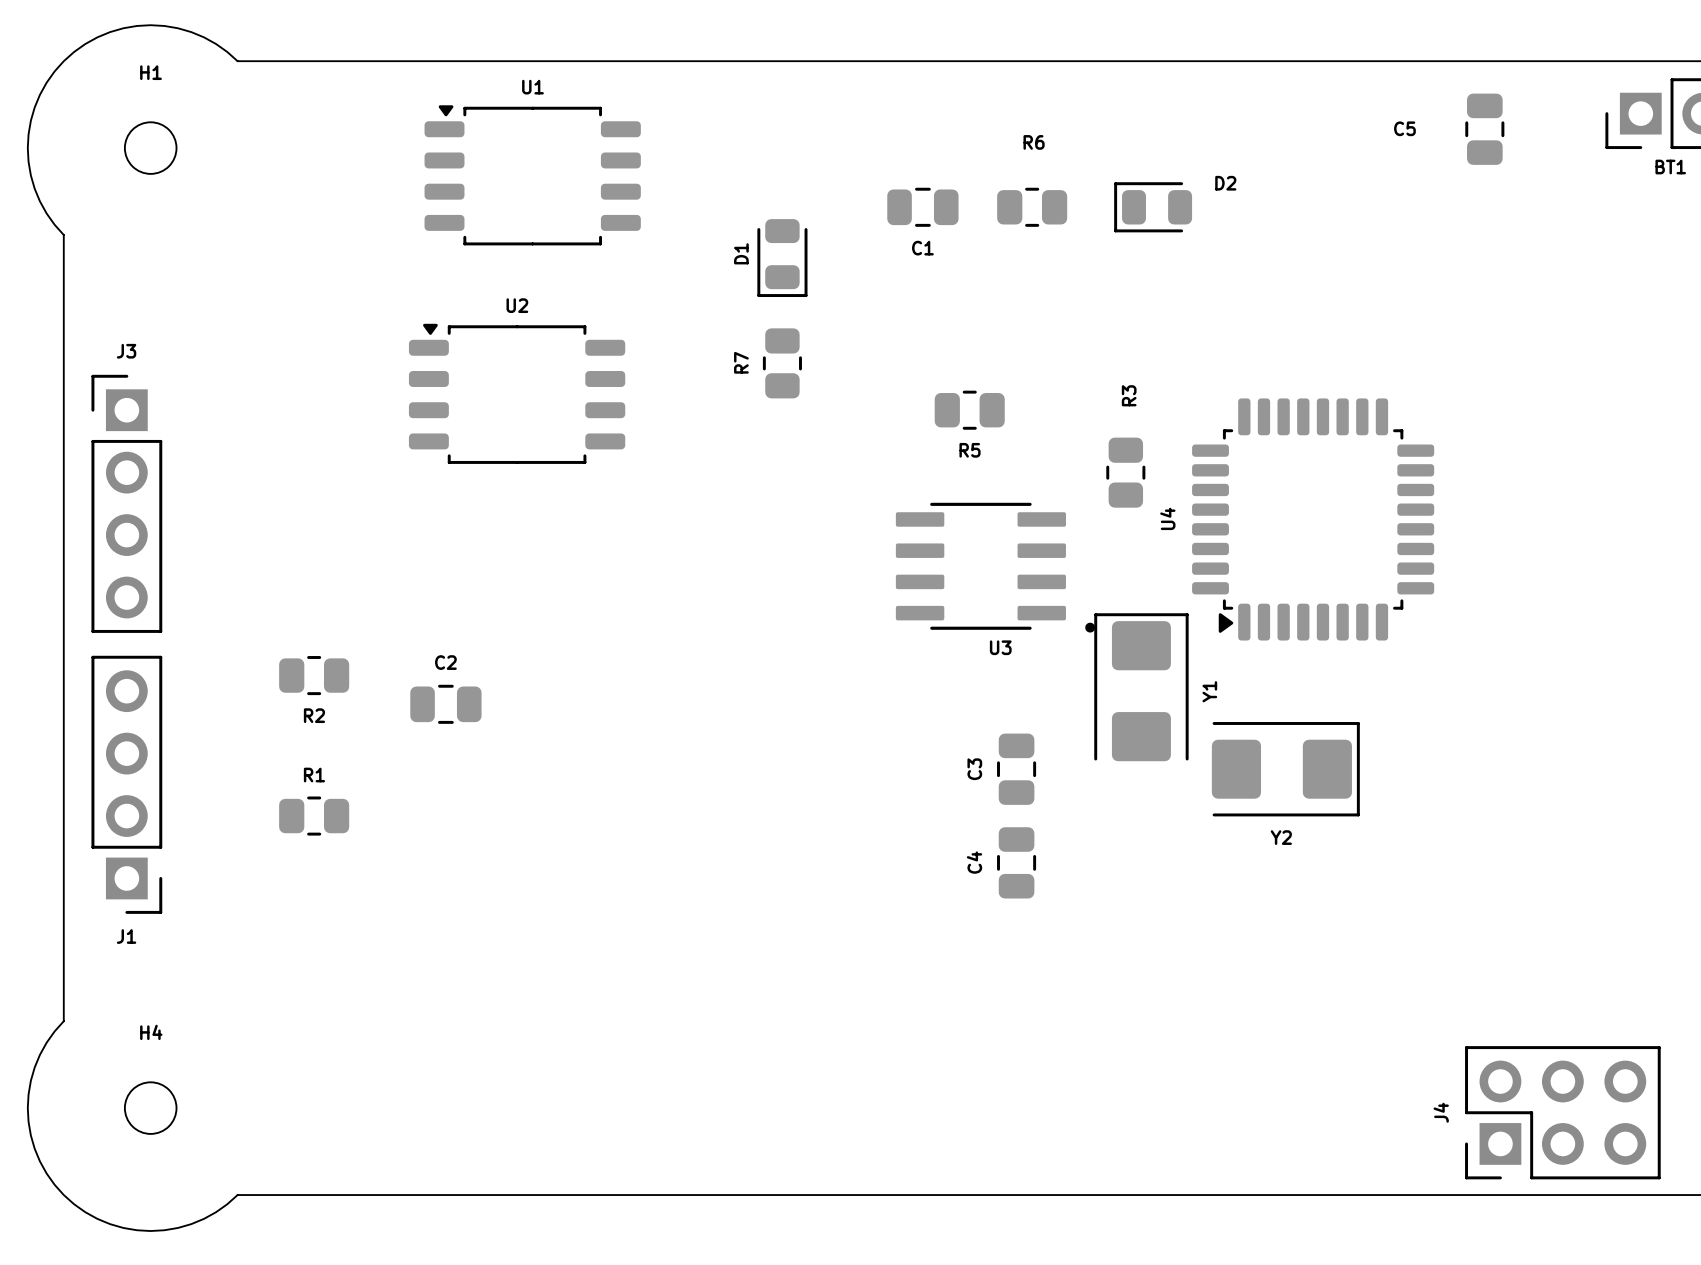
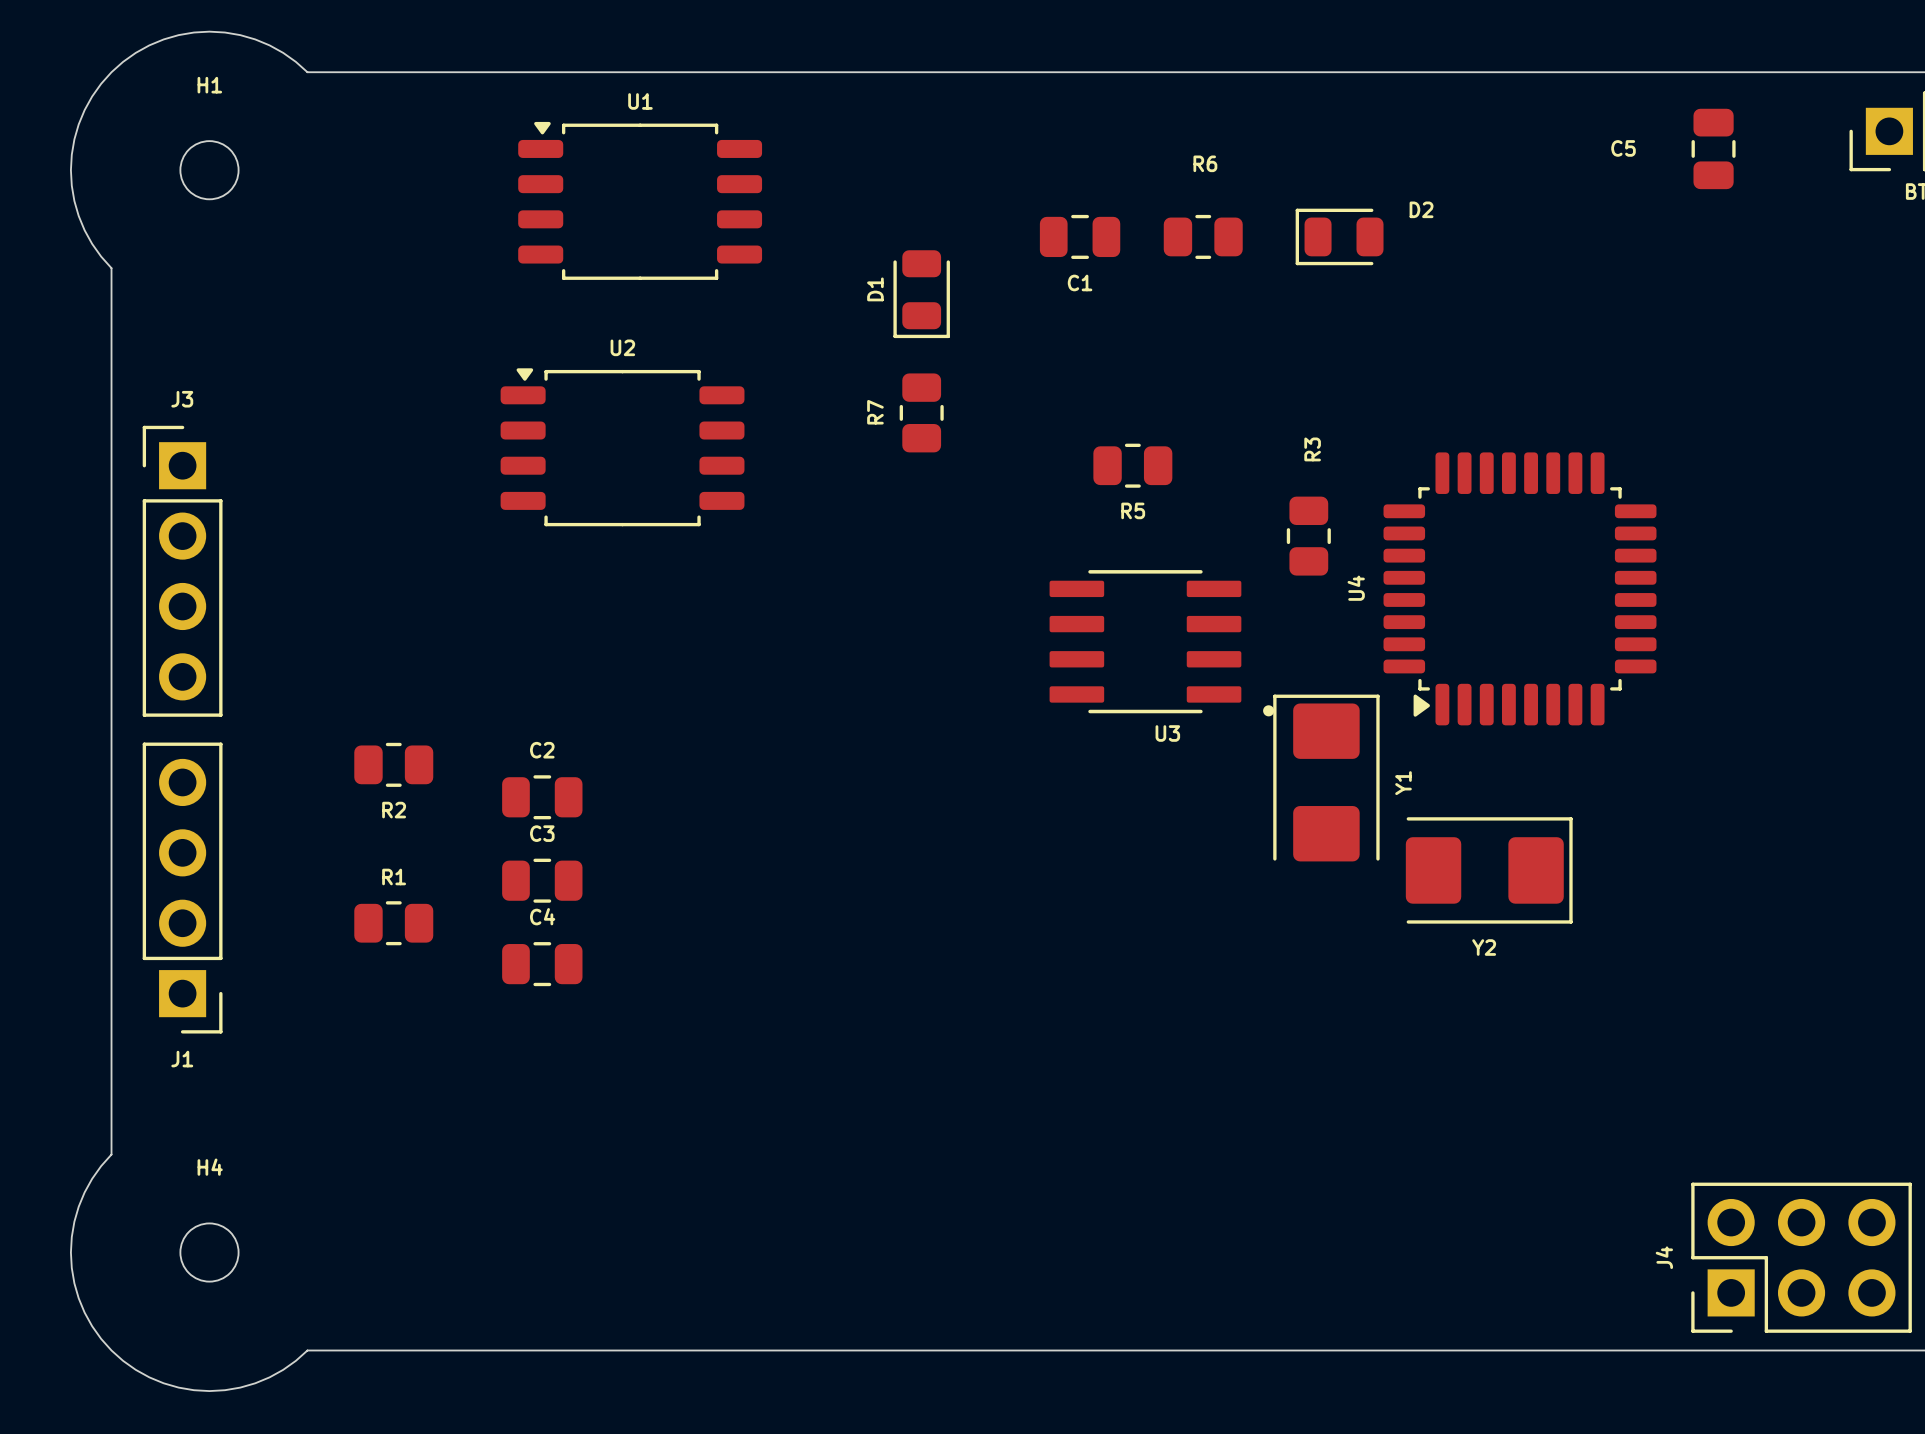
C3 rotation: 0° (1016, 769) -> 90° clockwise (542, 880)
C3 position: (1016, 769) -> (542, 880)
C4 rotation: 0° (1016, 862) -> 90° clockwise (542, 964)
C4 position: (1016, 862) -> (542, 964)

